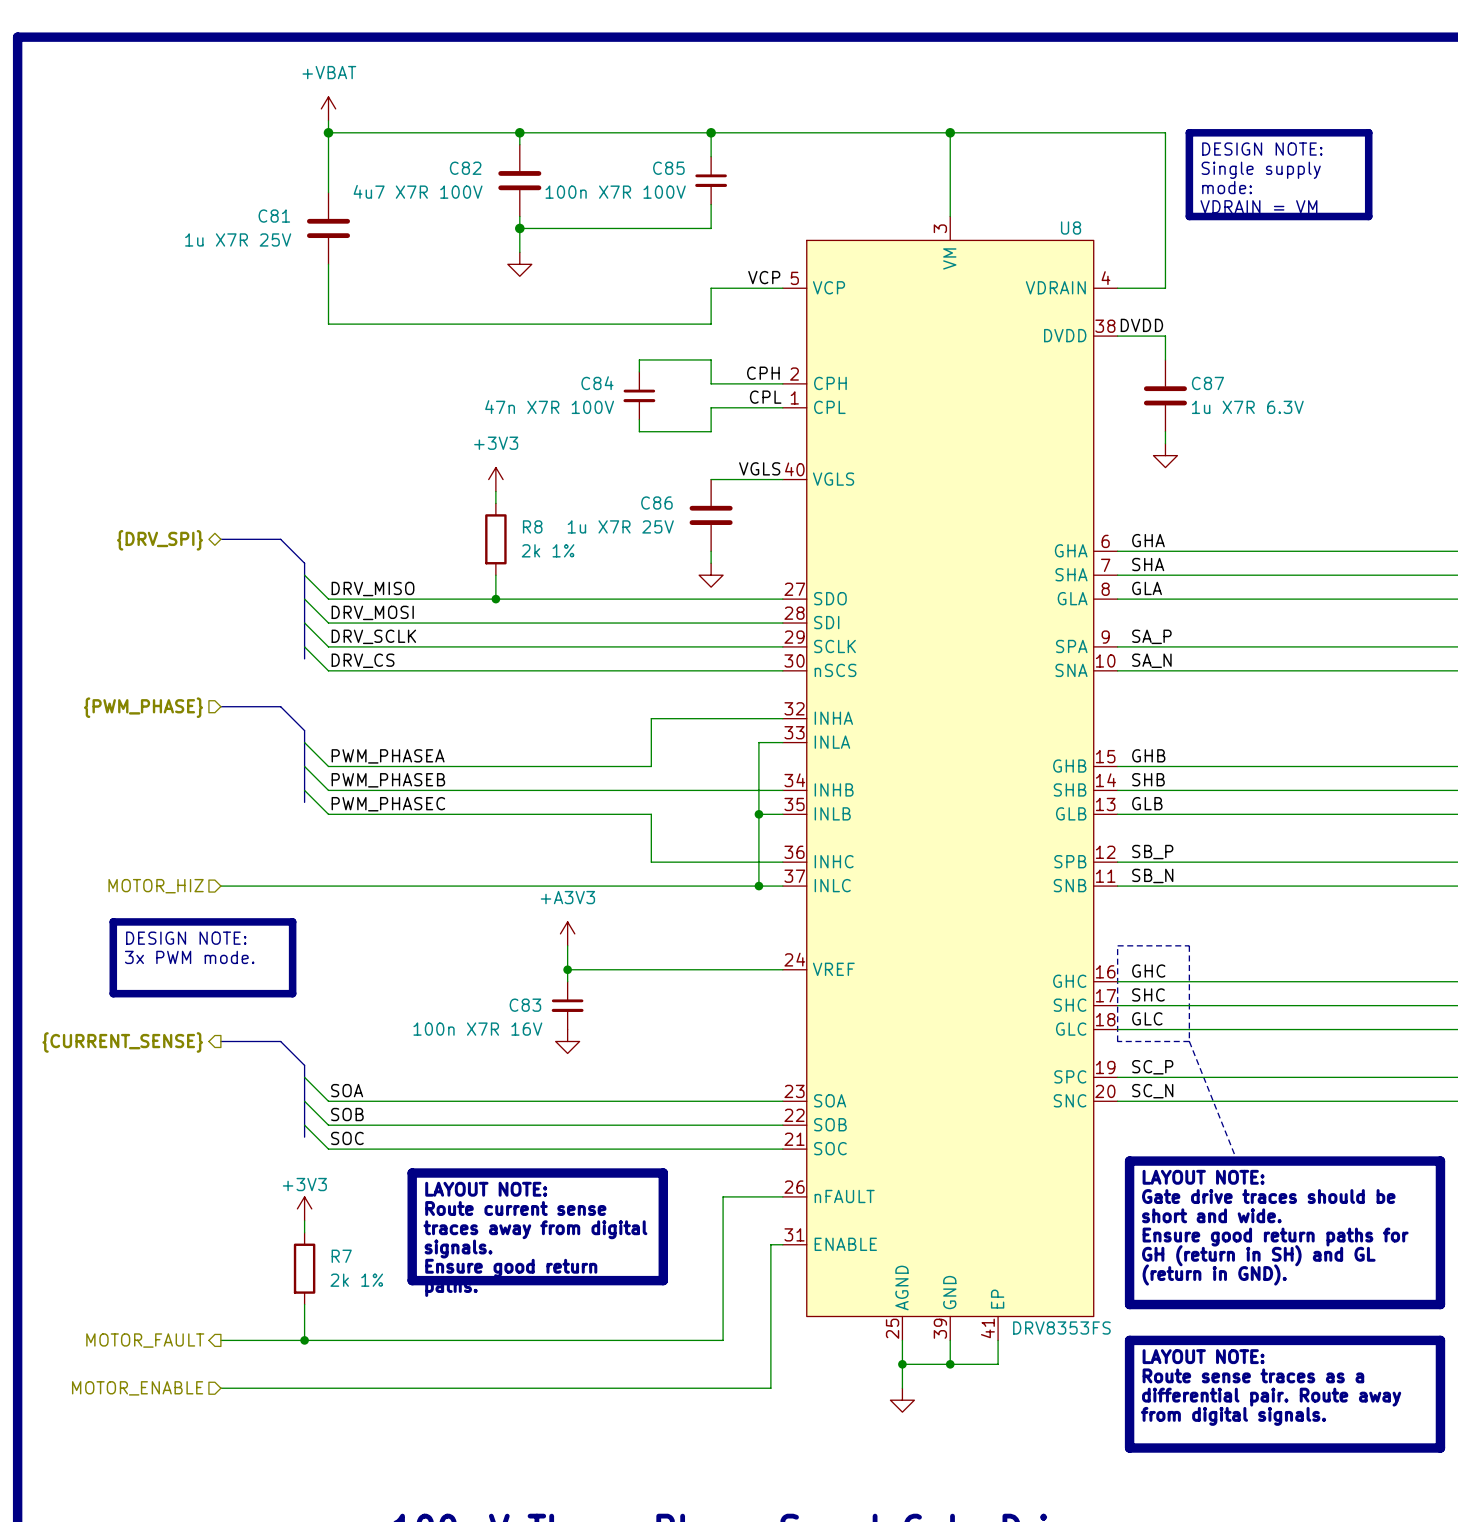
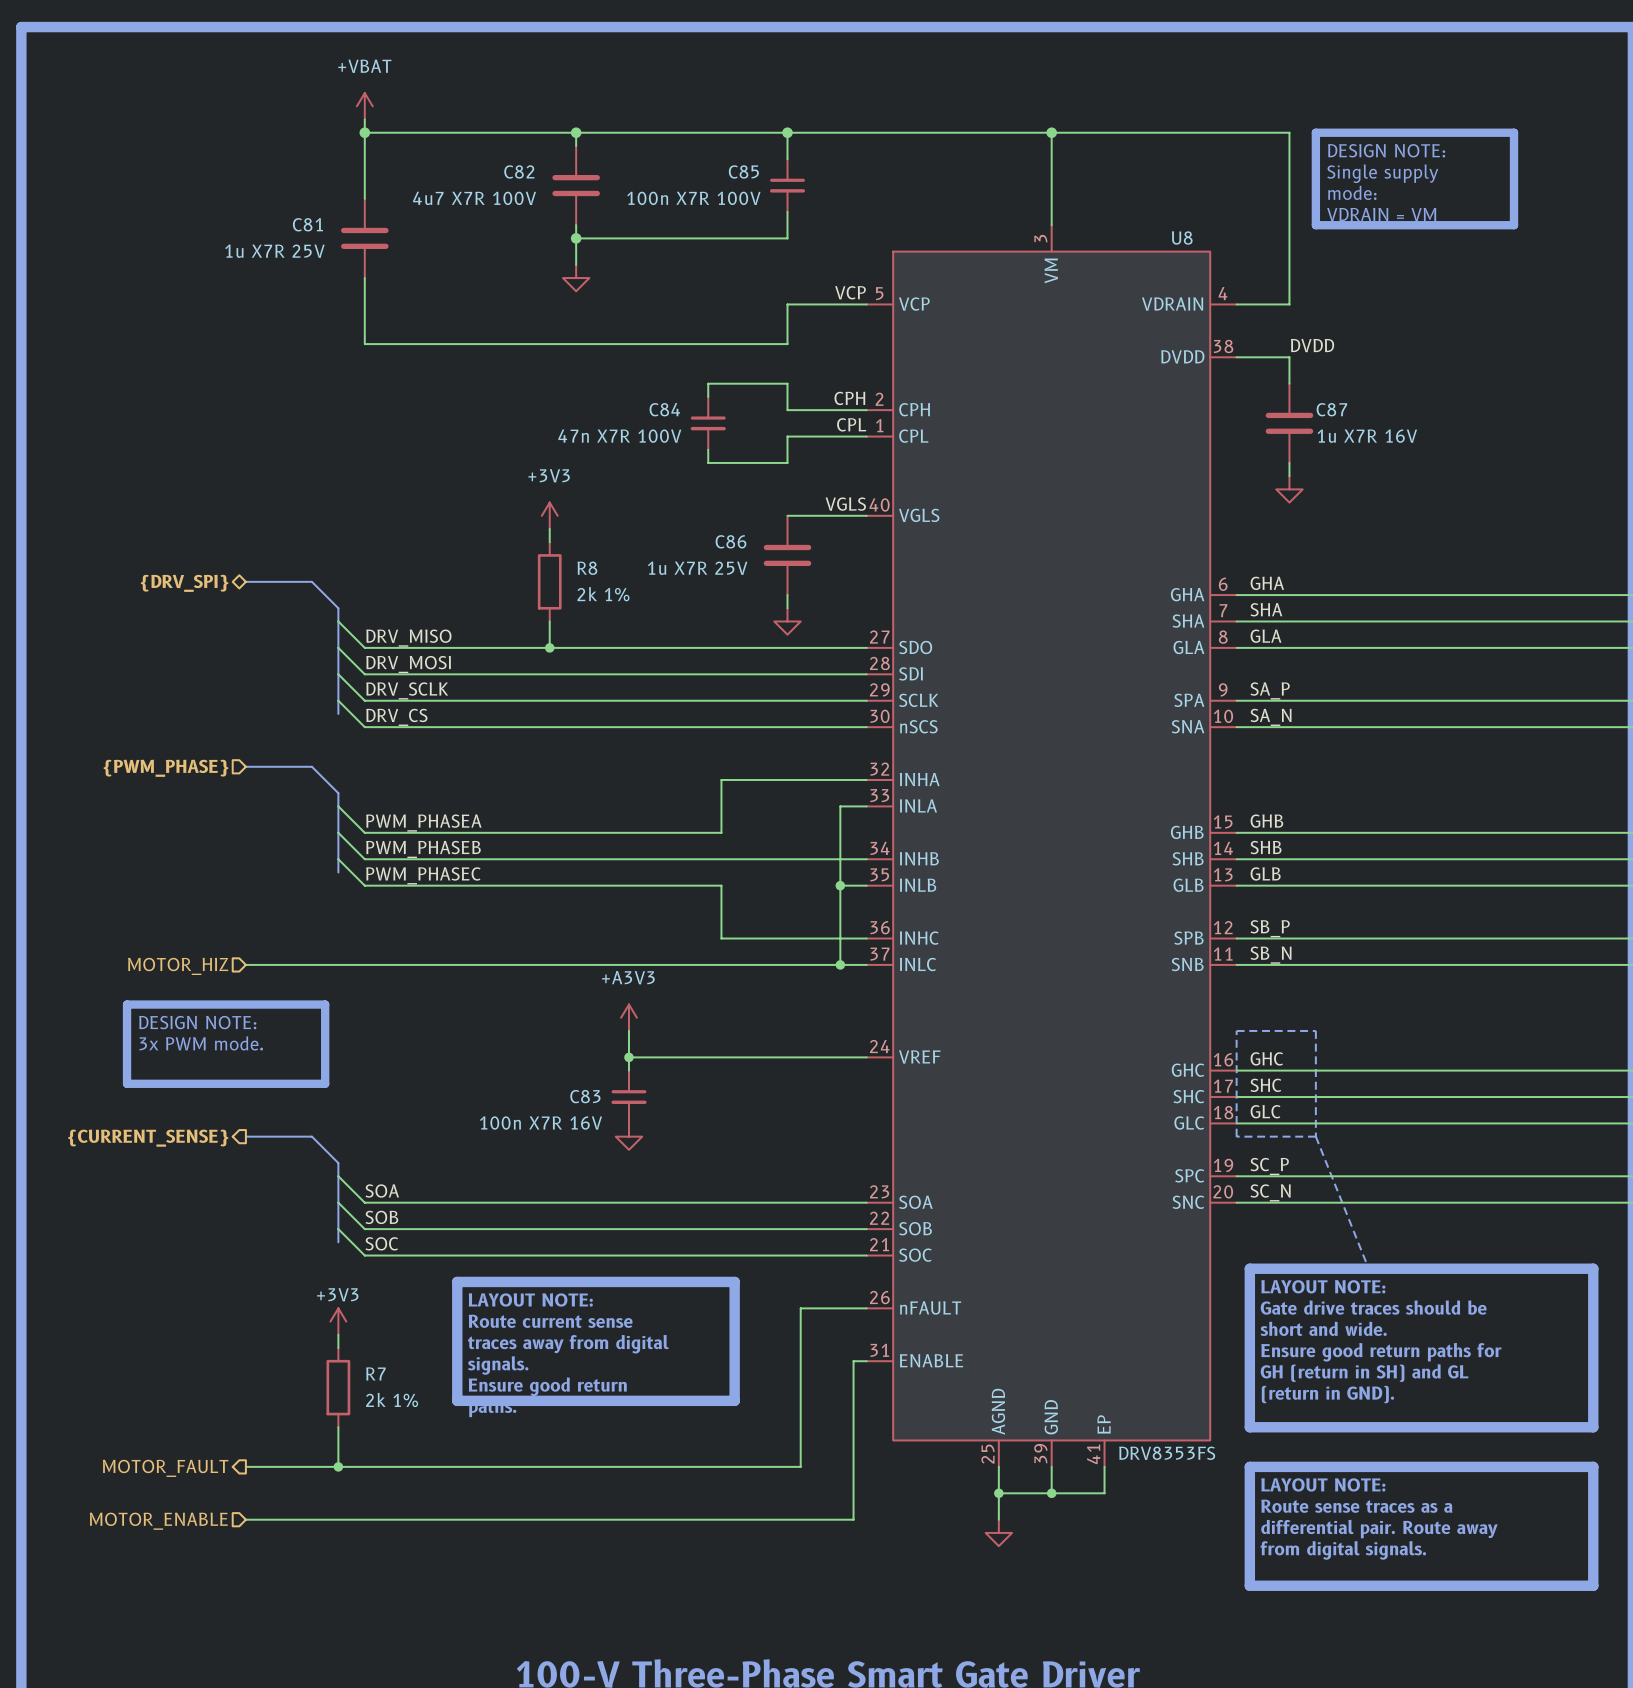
label position: DVDD (1141, 325) -> DVDD (1312, 345)
C87 value: 1u X7R 6.3V (1247, 407) -> 1u X7R 16V (1367, 436)

